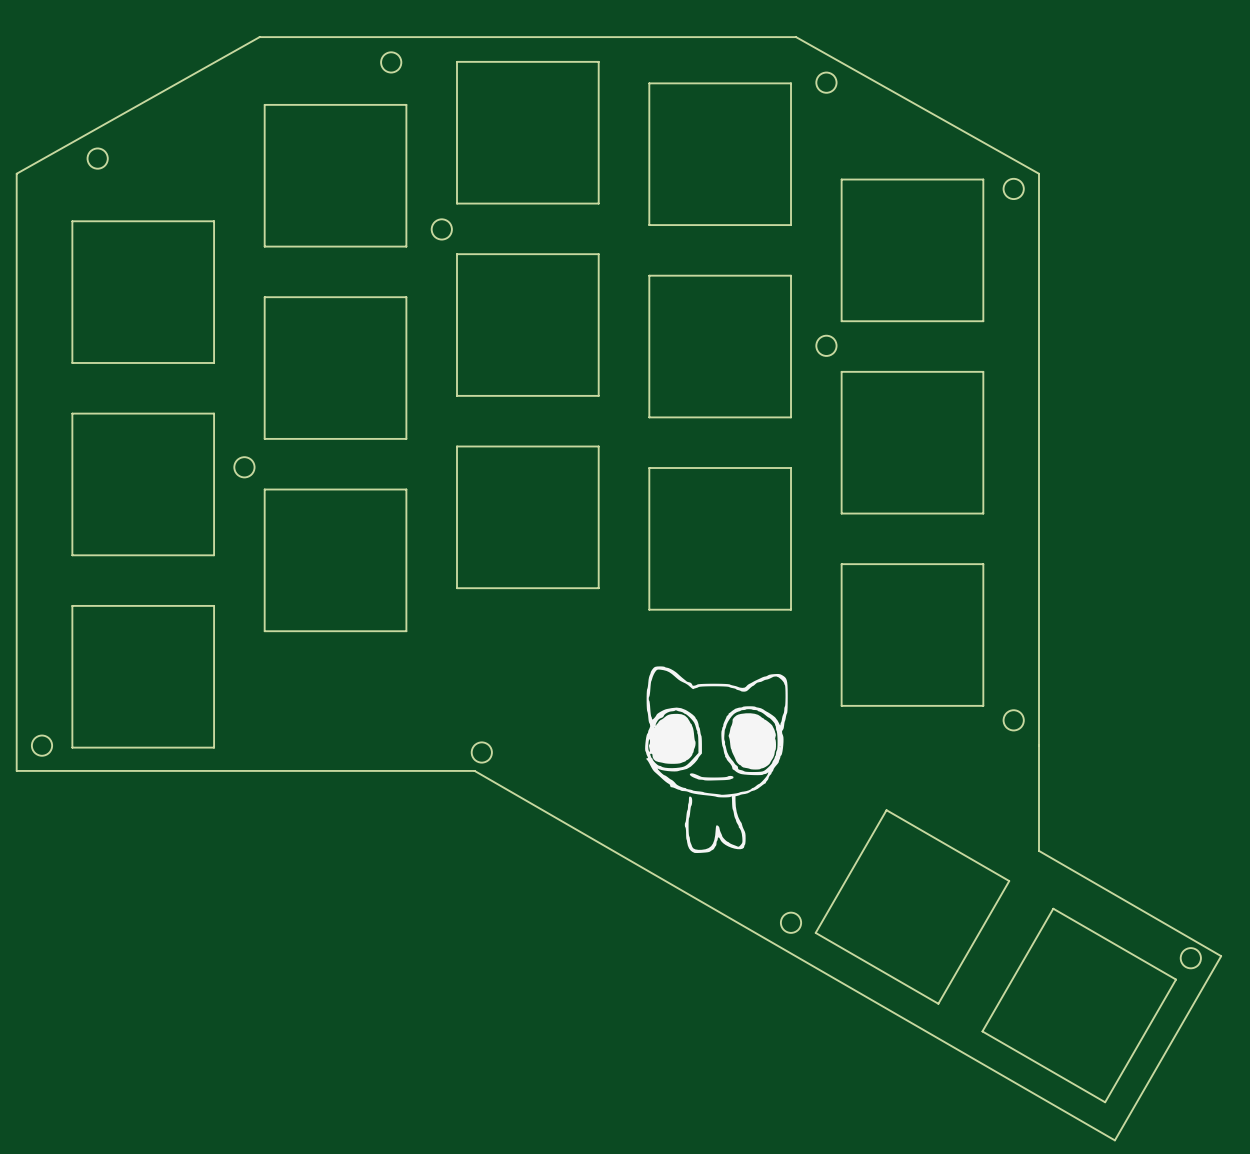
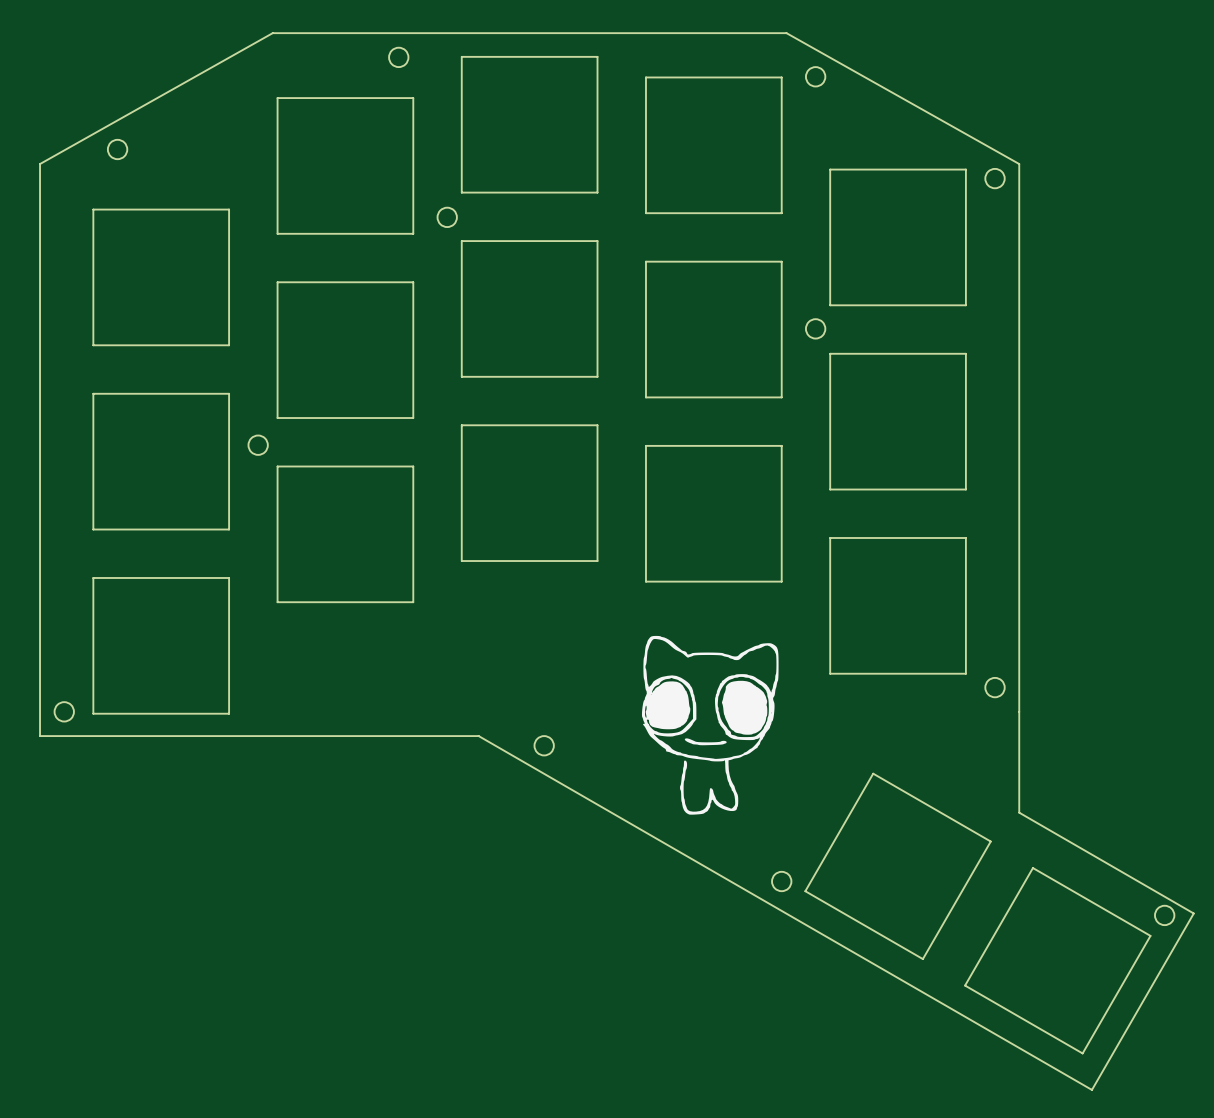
round board edge position: (481, 752) -> (544, 745)

